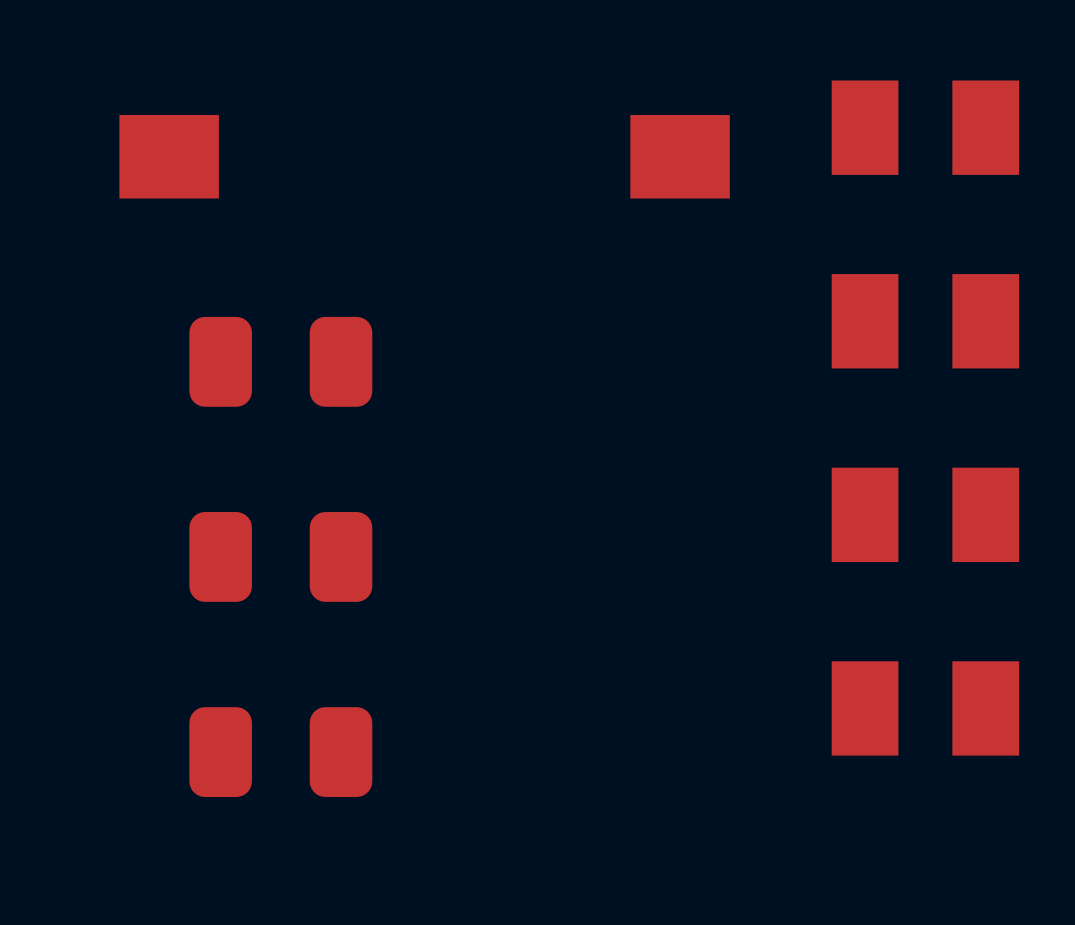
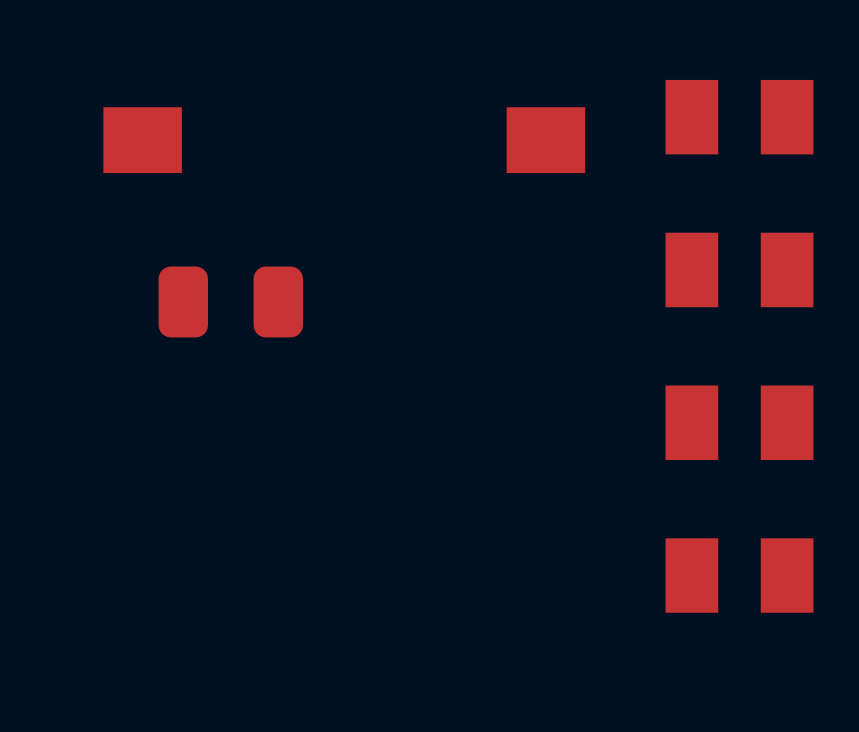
part: (280, 556) -> none
part: (280, 752) -> none

